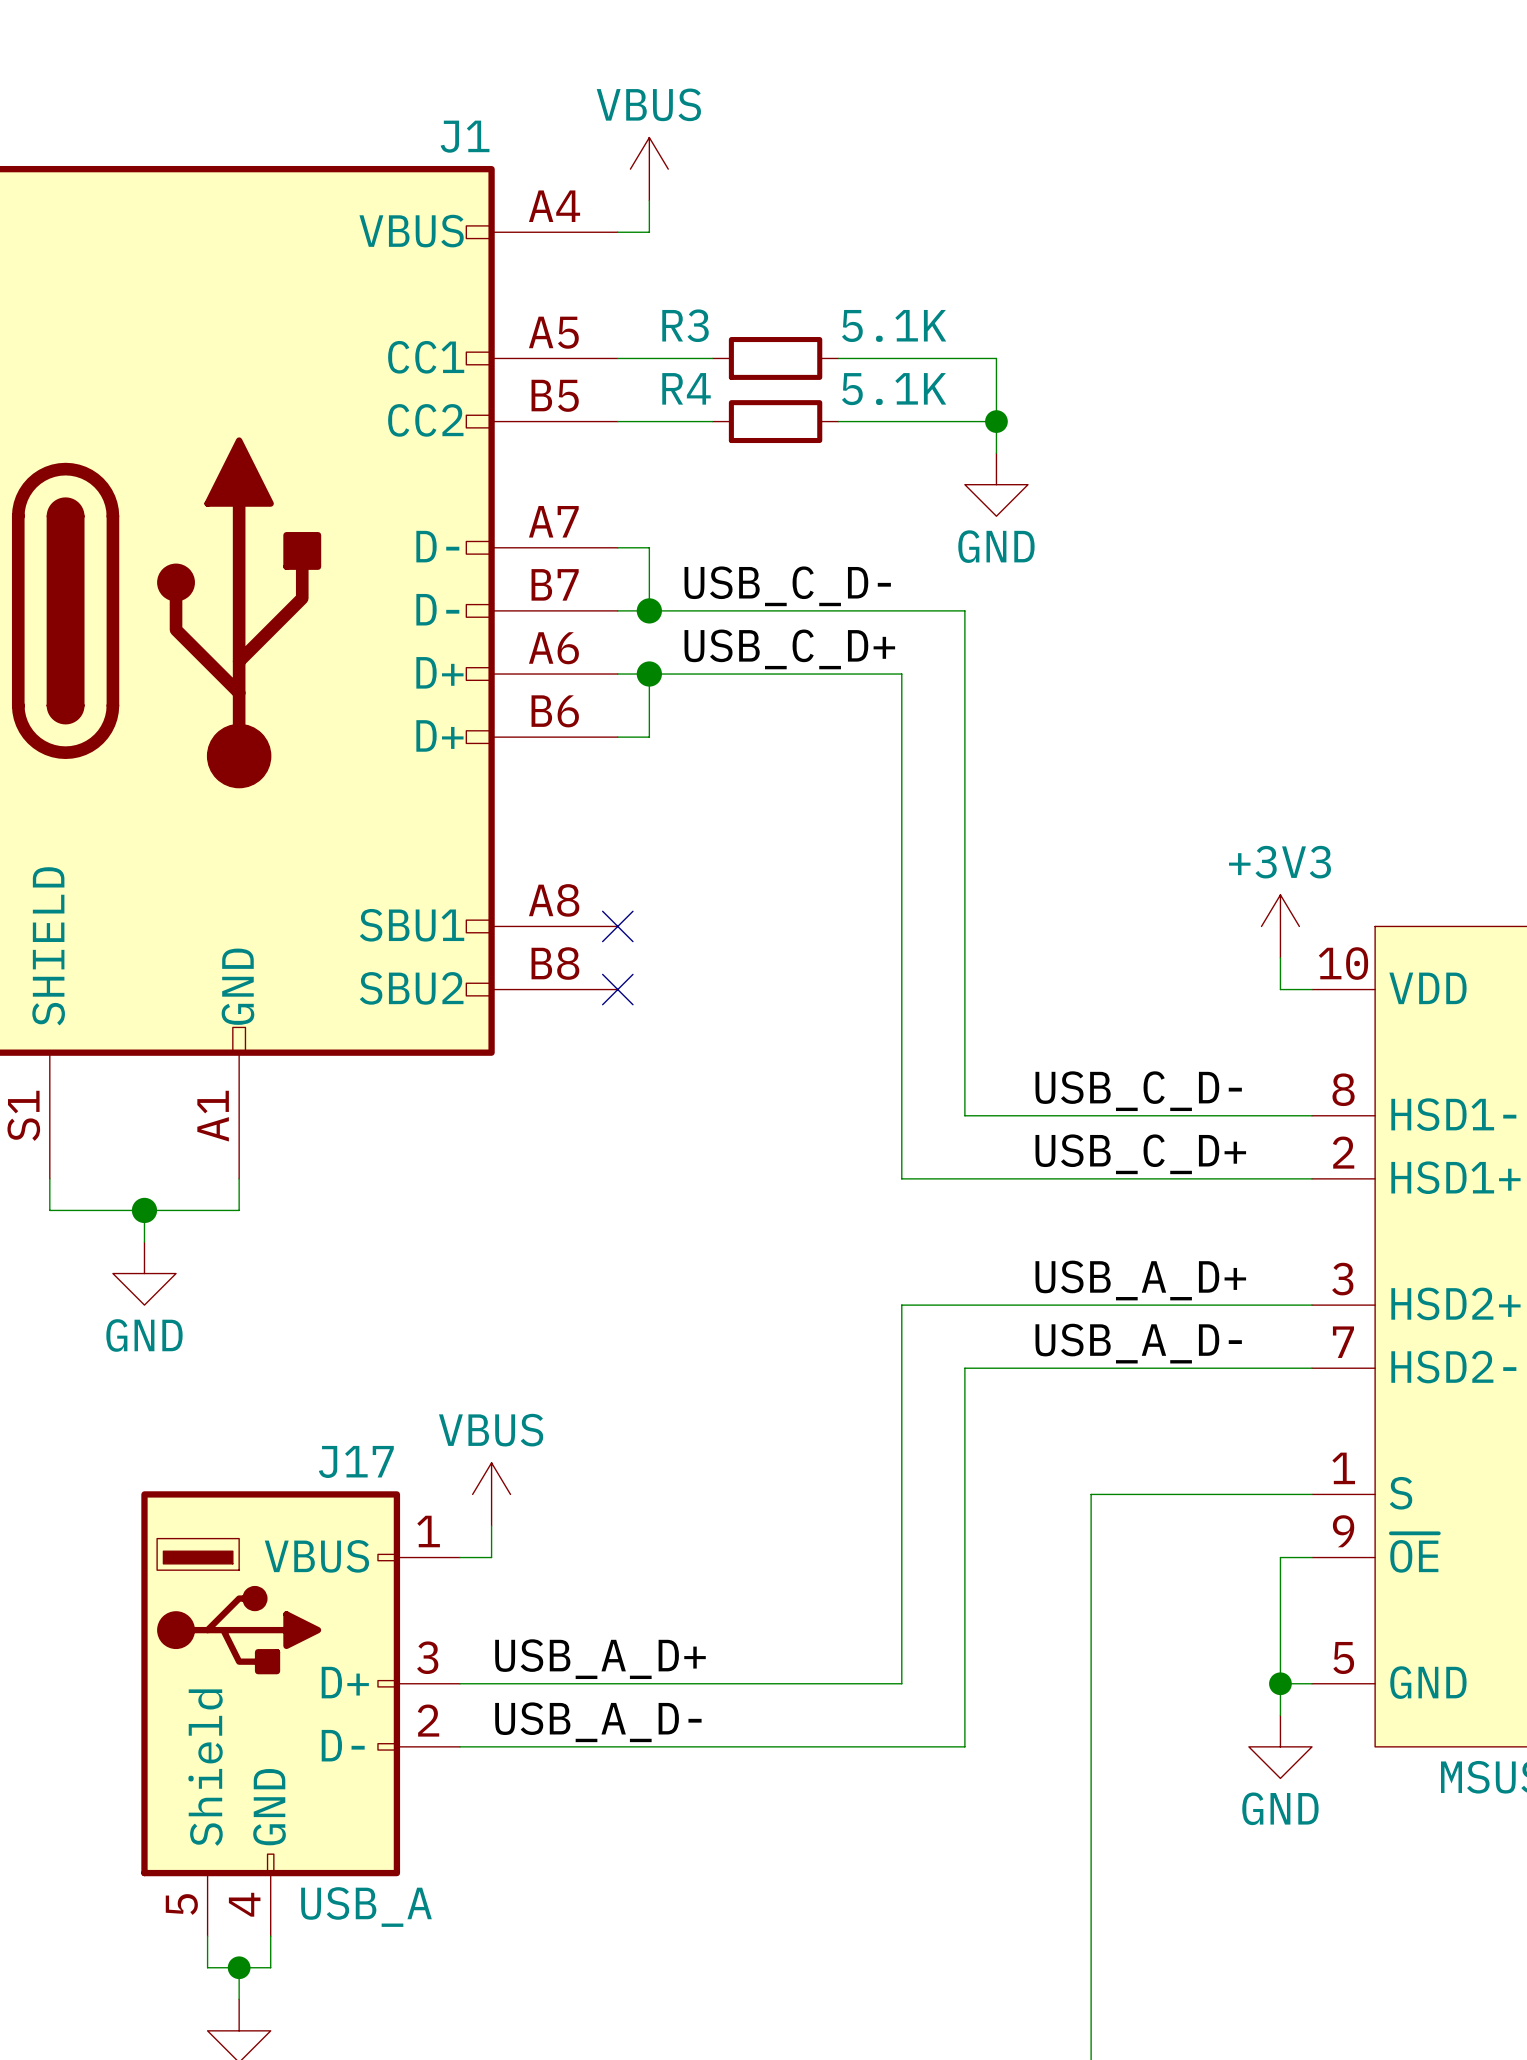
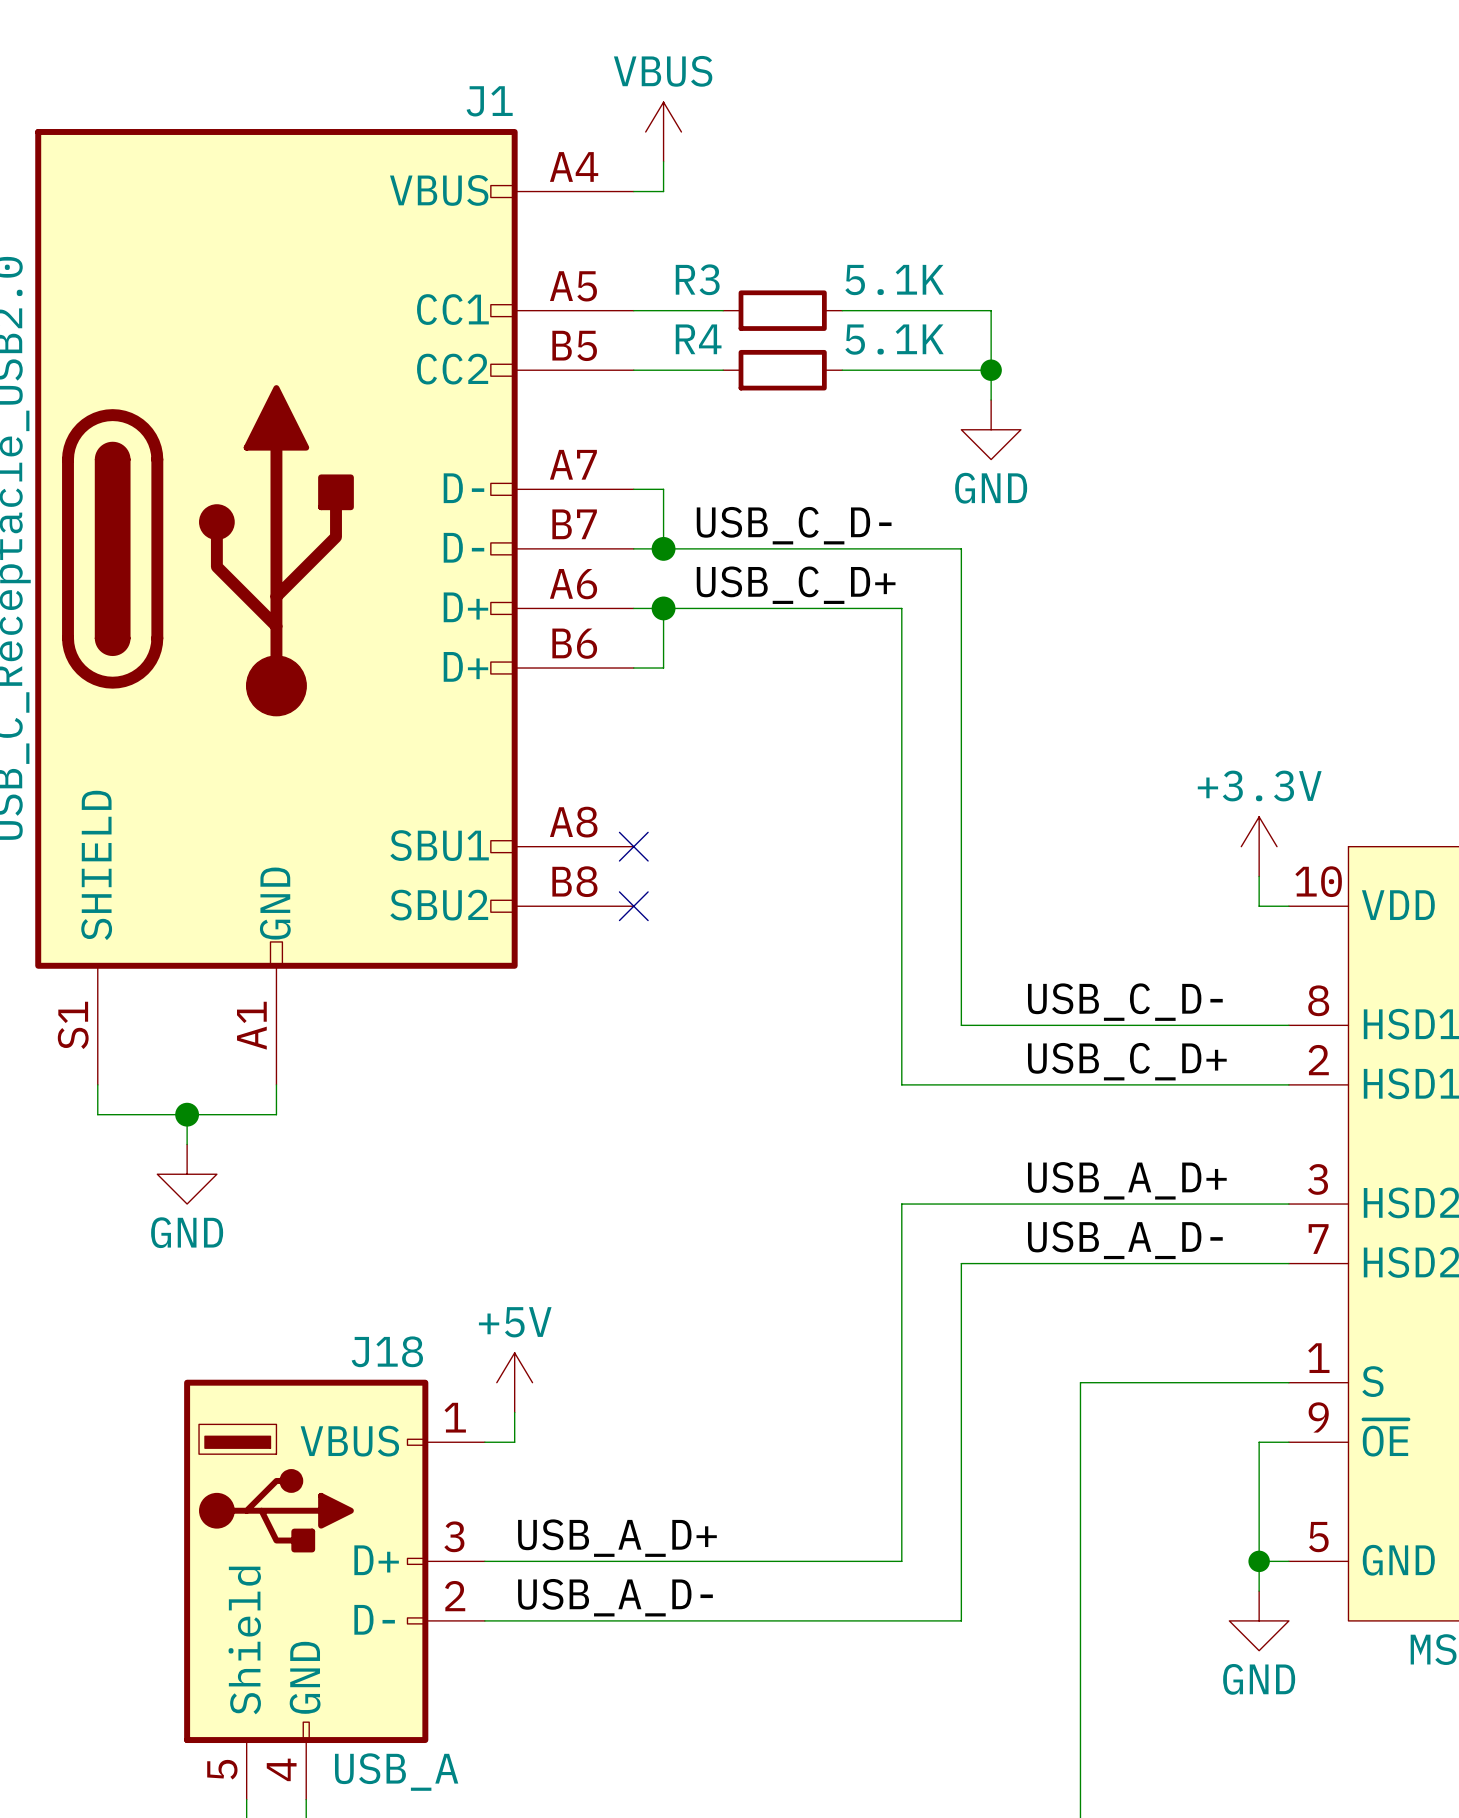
power symbol: +3V3 (1280, 926) -> +3.3V (1259, 846)
J17 name: J17 (356, 1461) -> J18 (387, 1351)
power symbol: VBUS (491, 1494) -> +5V (514, 1382)

